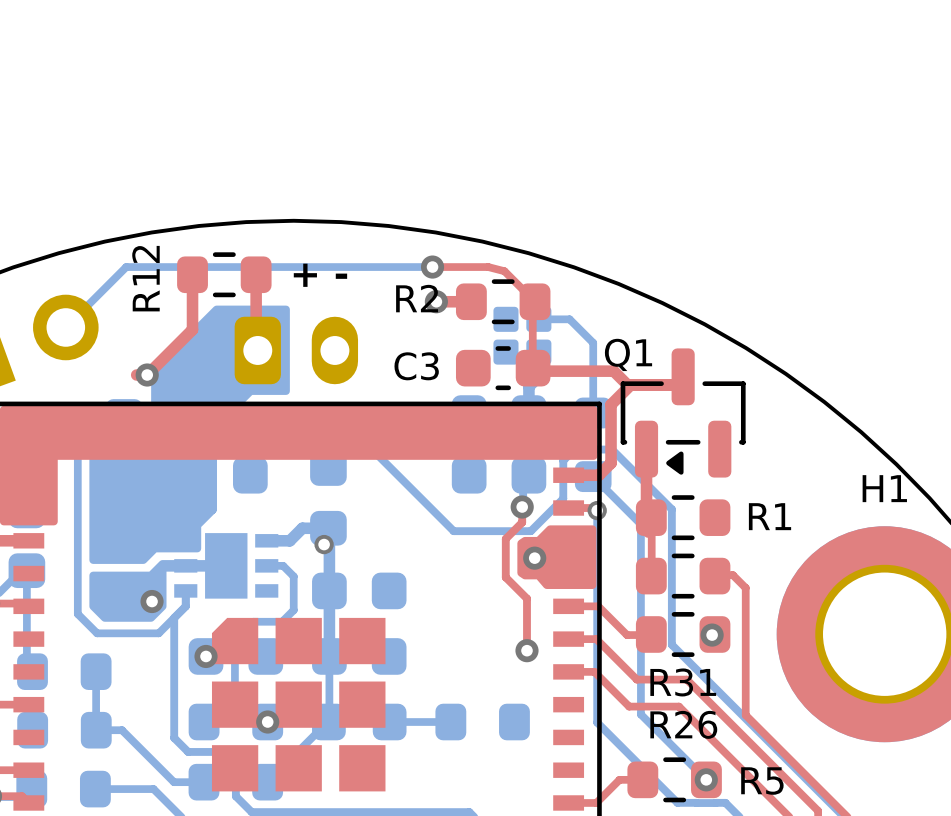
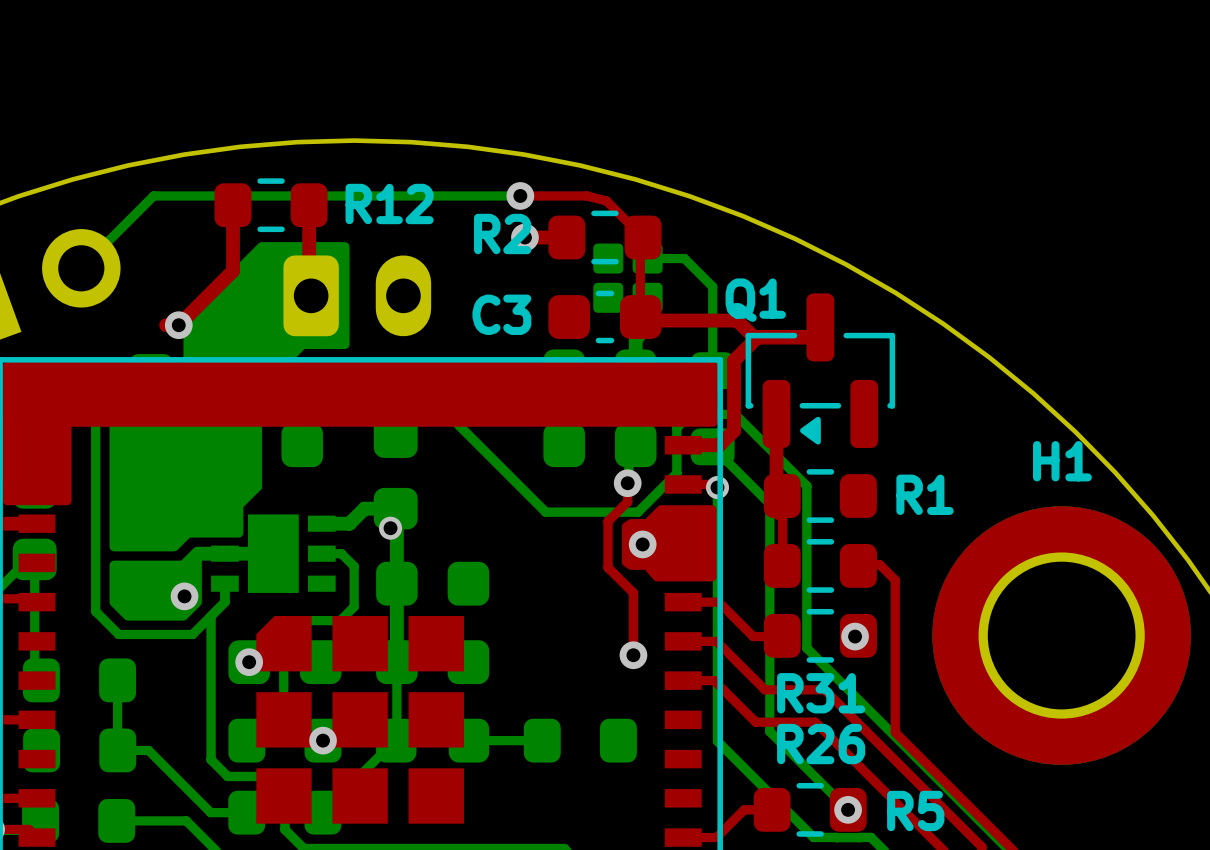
text: + - (320, 275) -> none
R12 name rotation: 0° (145, 278) -> 90° clockwise (389, 203)
R12 name position: R12 (145, 278) -> R12 (389, 203)

